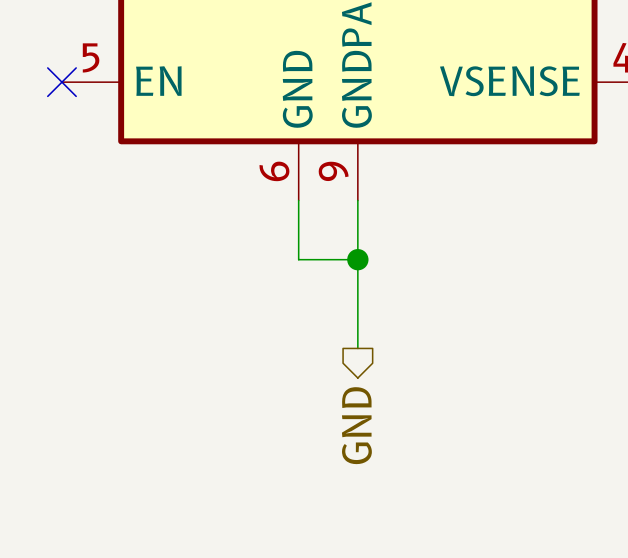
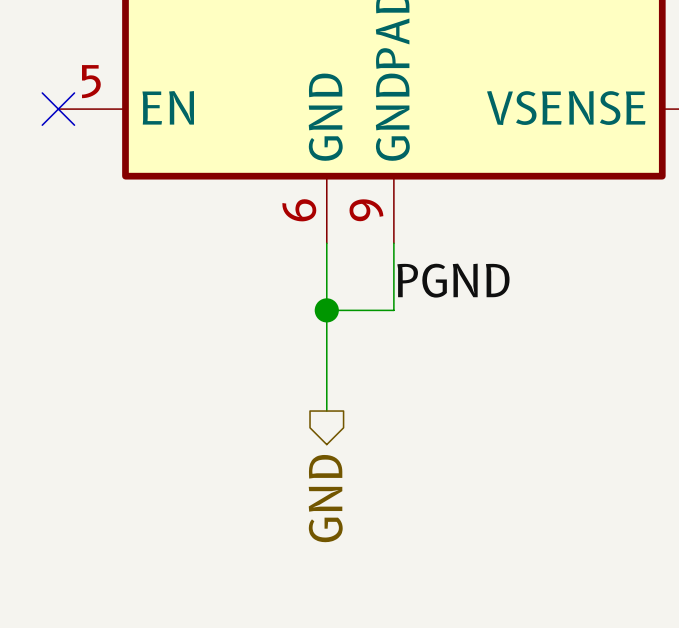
label: none -> PGND (453, 280)
wire: (357, 259) (357, 348) -> (326, 310) (326, 411)
junction position: (357, 259) -> (326, 310)
hierarchical label position: GND (356, 425) -> GND (325, 498)

